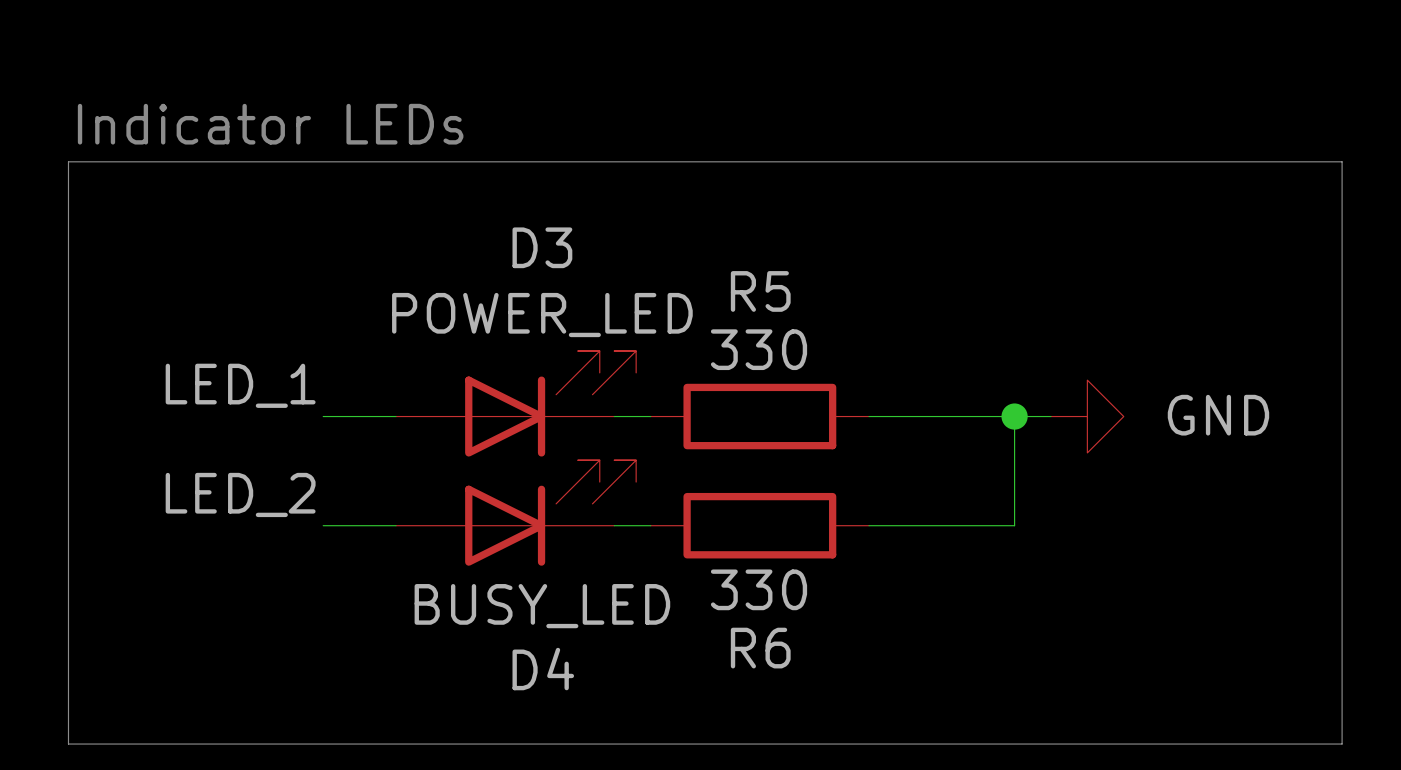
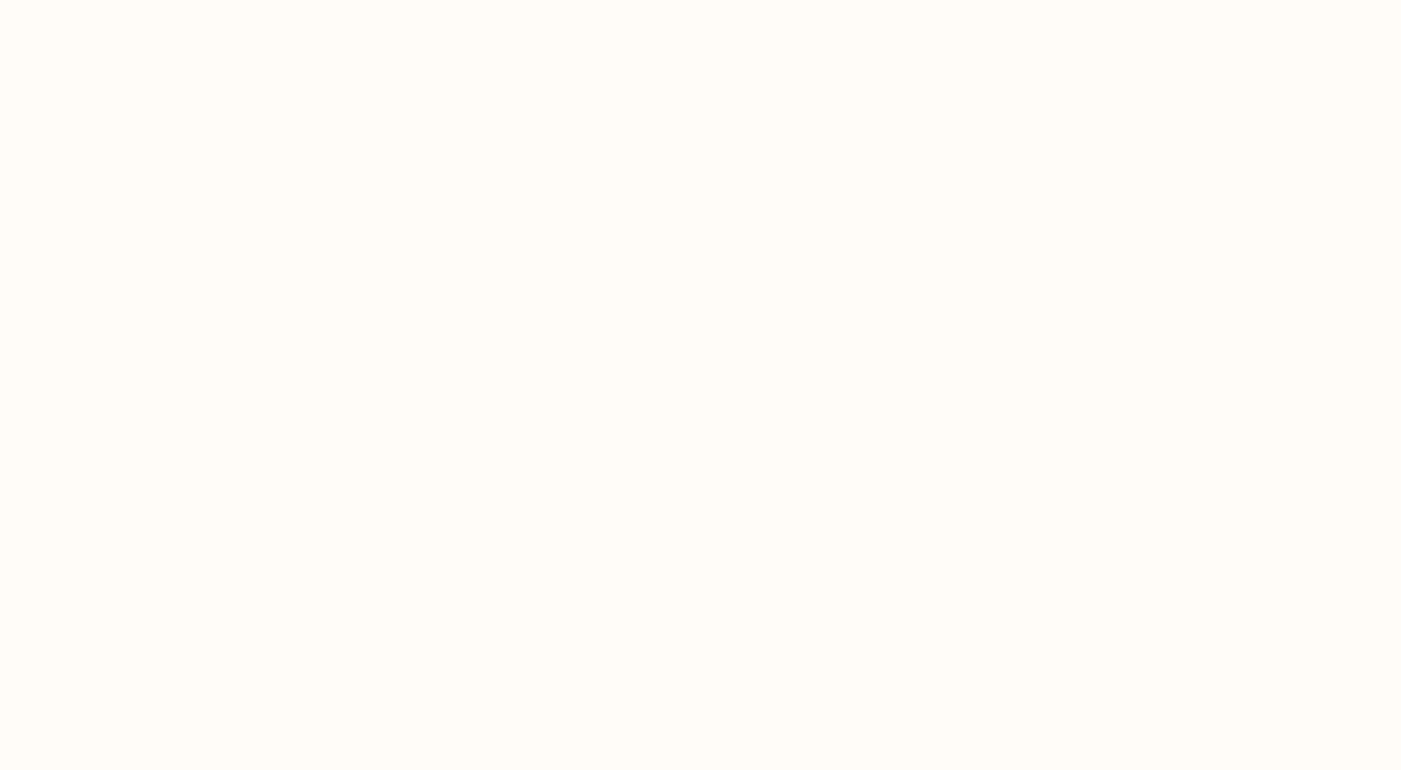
text: Indicator LEDs (270, 124) -> none
line: (68, 161) (1342, 161) (1342, 744) (68, 744) (68, 161) -> none
label: LED_1 (240, 385) -> none
D3: POWER_LED (516, 403) -> none
wire: (323, 416) (395, 416) -> none
wire: (614, 416) (650, 416) -> none
R5: 330 (759, 416) -> none
wire: (869, 416) (1050, 416) -> none
wire: (1014, 416) (1014, 525) (869, 525) -> none
junction: (1014, 416) -> none
power symbol: GND (1087, 416) -> none
label: LED_2 (240, 494) -> none
D4: BUSY_LED (516, 512) -> none
wire: (323, 525) (395, 525) -> none
wire: (614, 525) (650, 525) -> none
R6: 330 (759, 525) -> none

